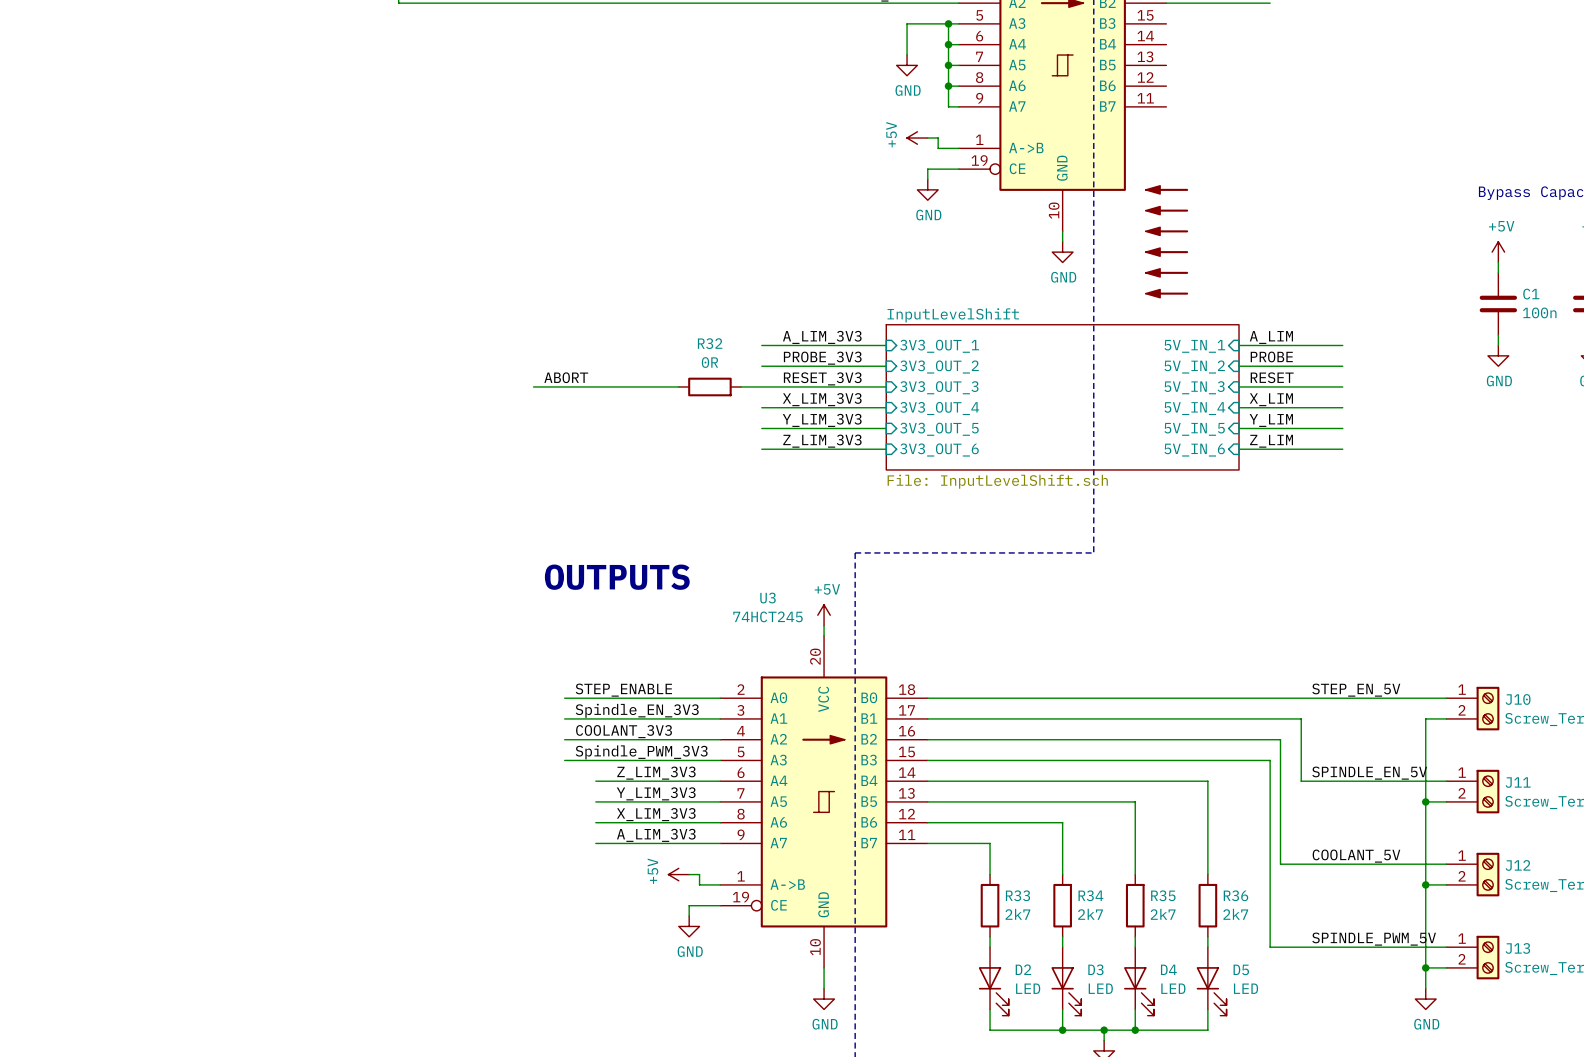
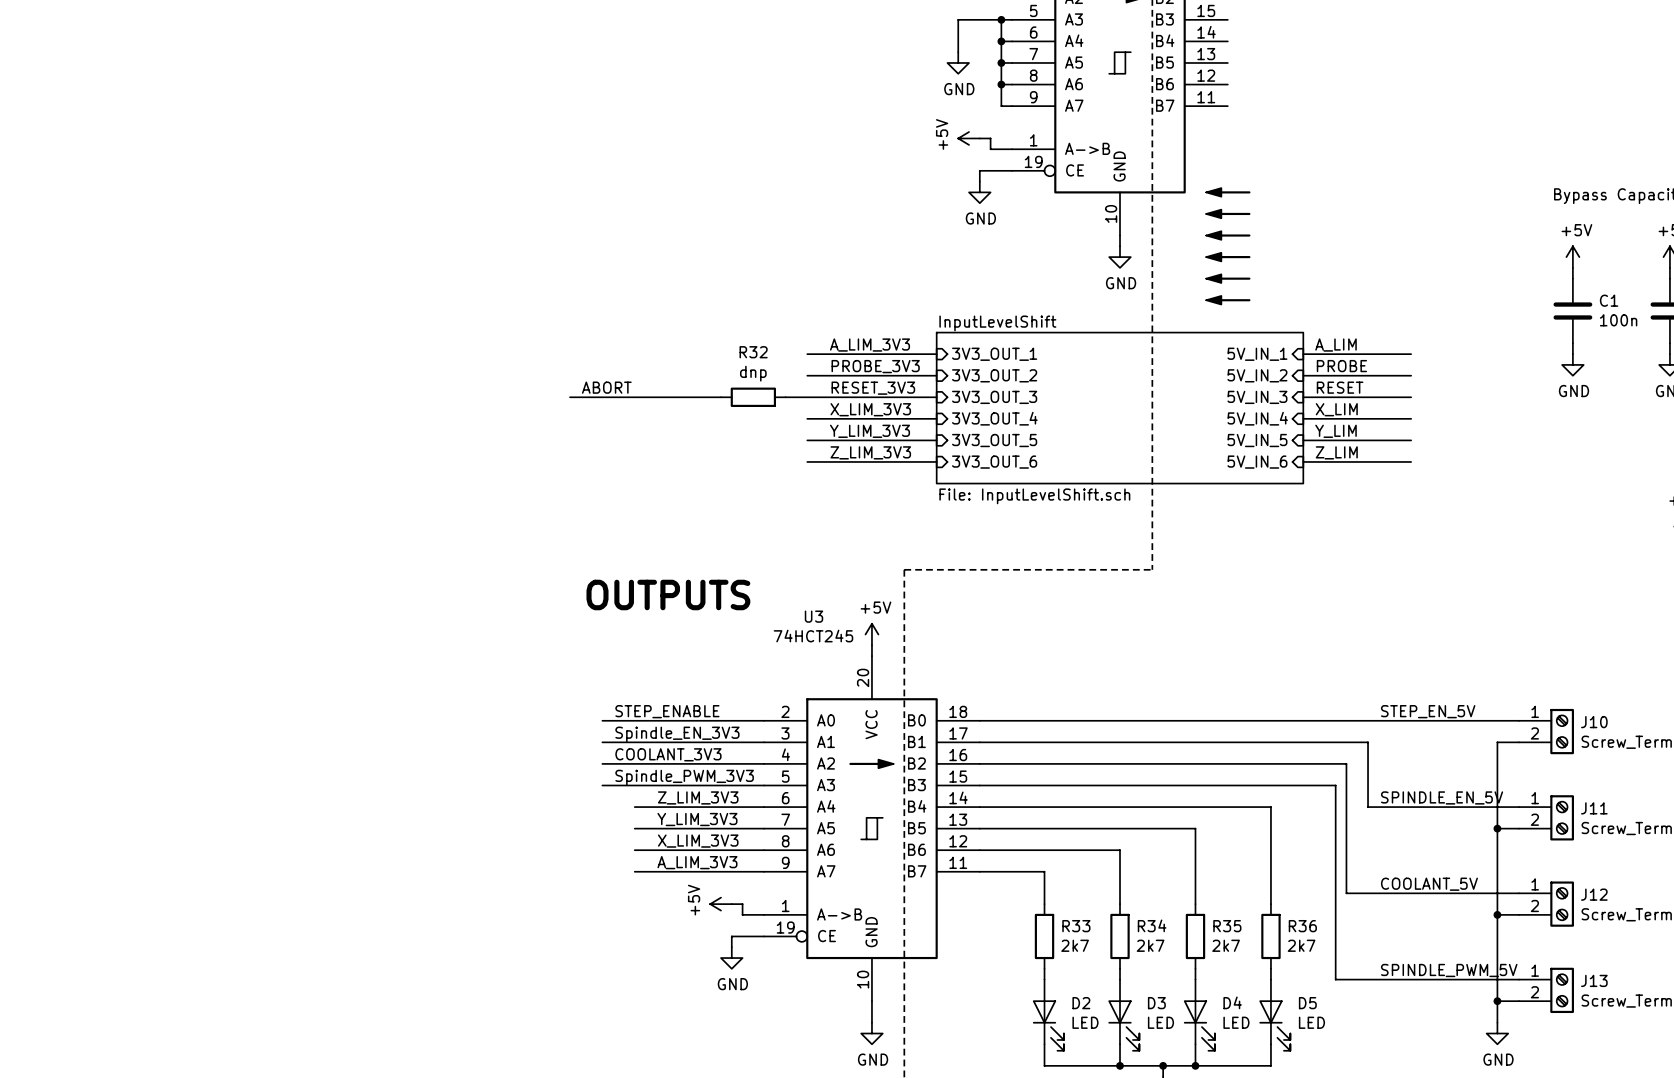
R32 value: 0R (709, 362) -> dnp (753, 373)

